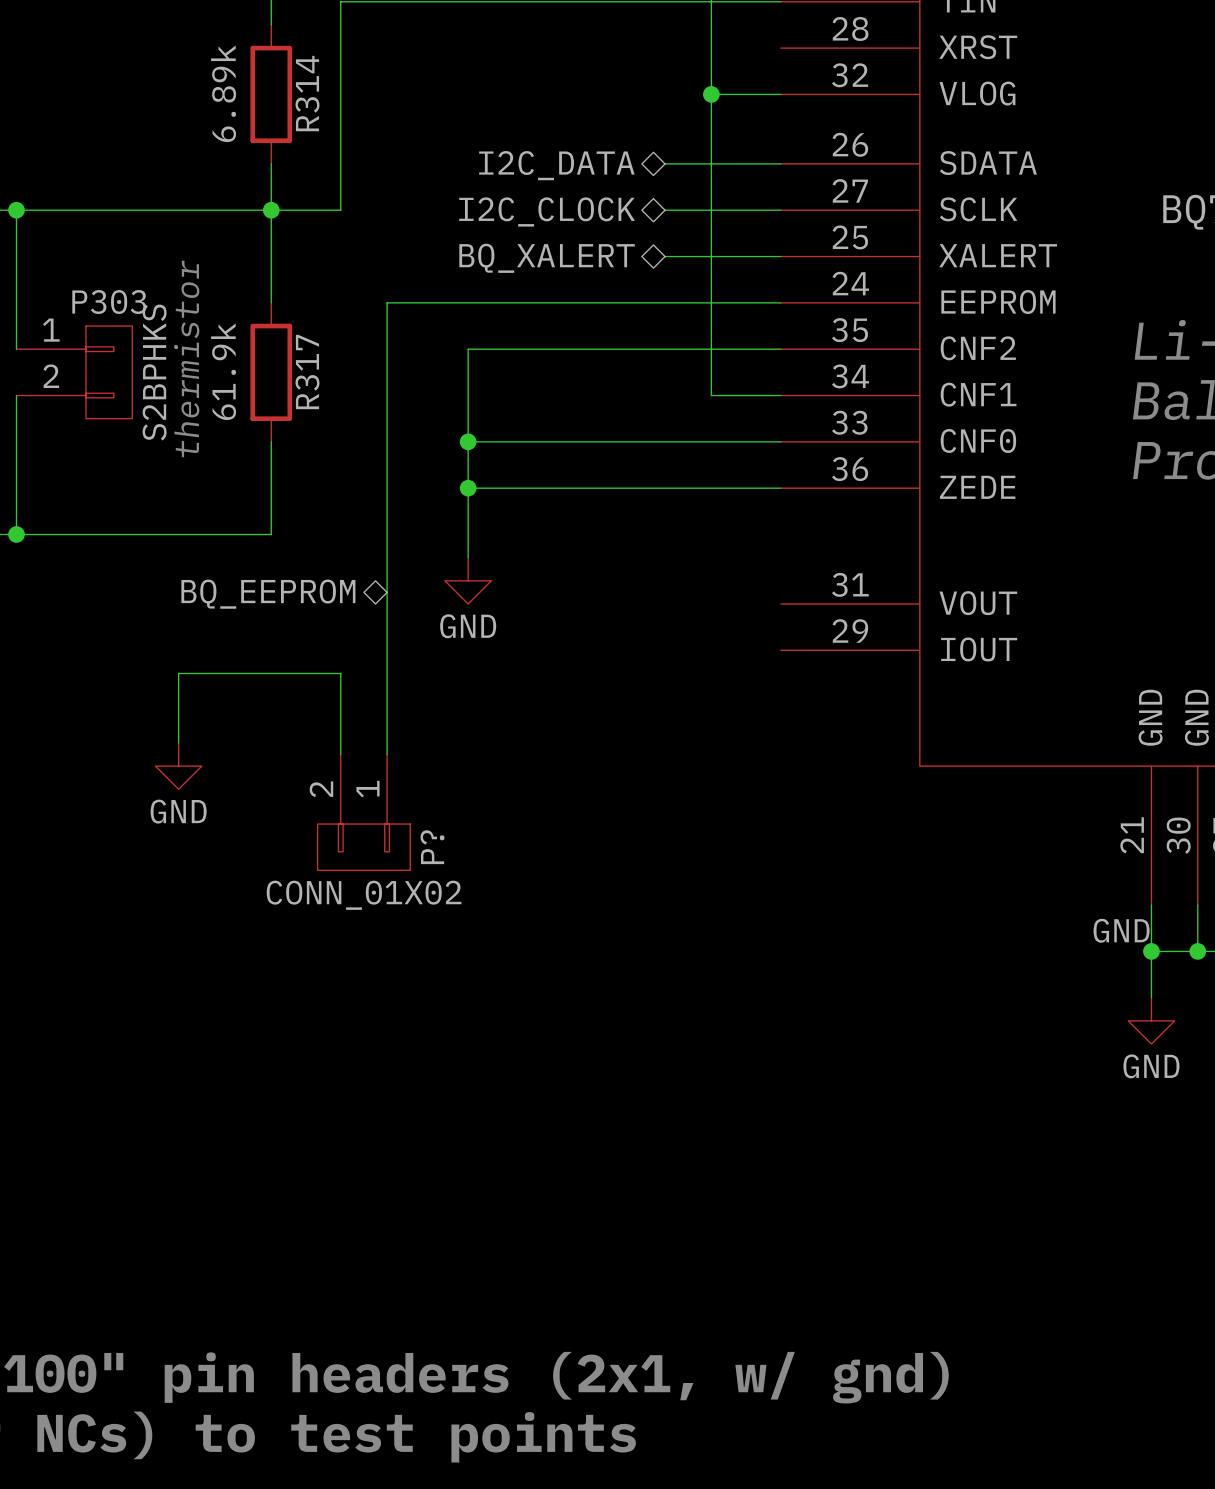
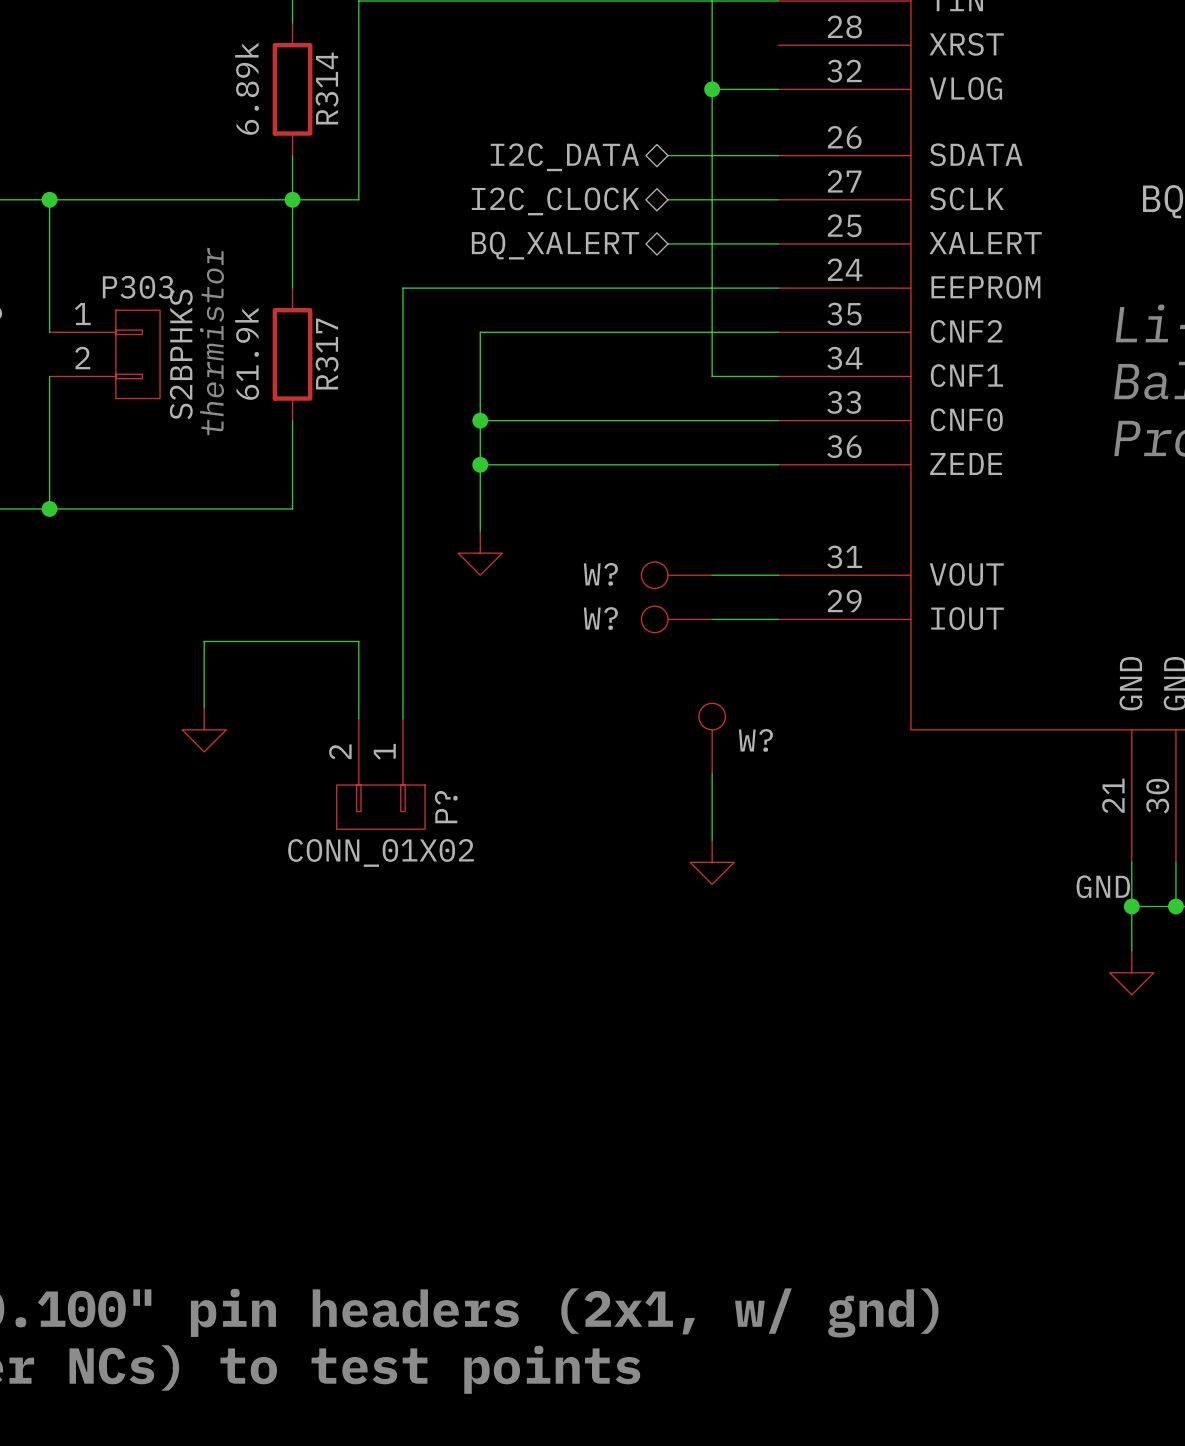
hierarchical label: BQ_EEPROM (268, 594) -> none
W?: none -> (676, 575)
wire: none -> (712, 575) (778, 575)
power symbol text: GND (468, 626) -> none
W?: none -> (676, 619)
wire: none -> (712, 619) (778, 619)
W?: none -> (712, 738)
power symbol text: GND (178, 811) -> none
wire: none -> (712, 773) (712, 840)
power symbol: none -> (712, 862)
power symbol text: GND (1151, 1066) -> none

